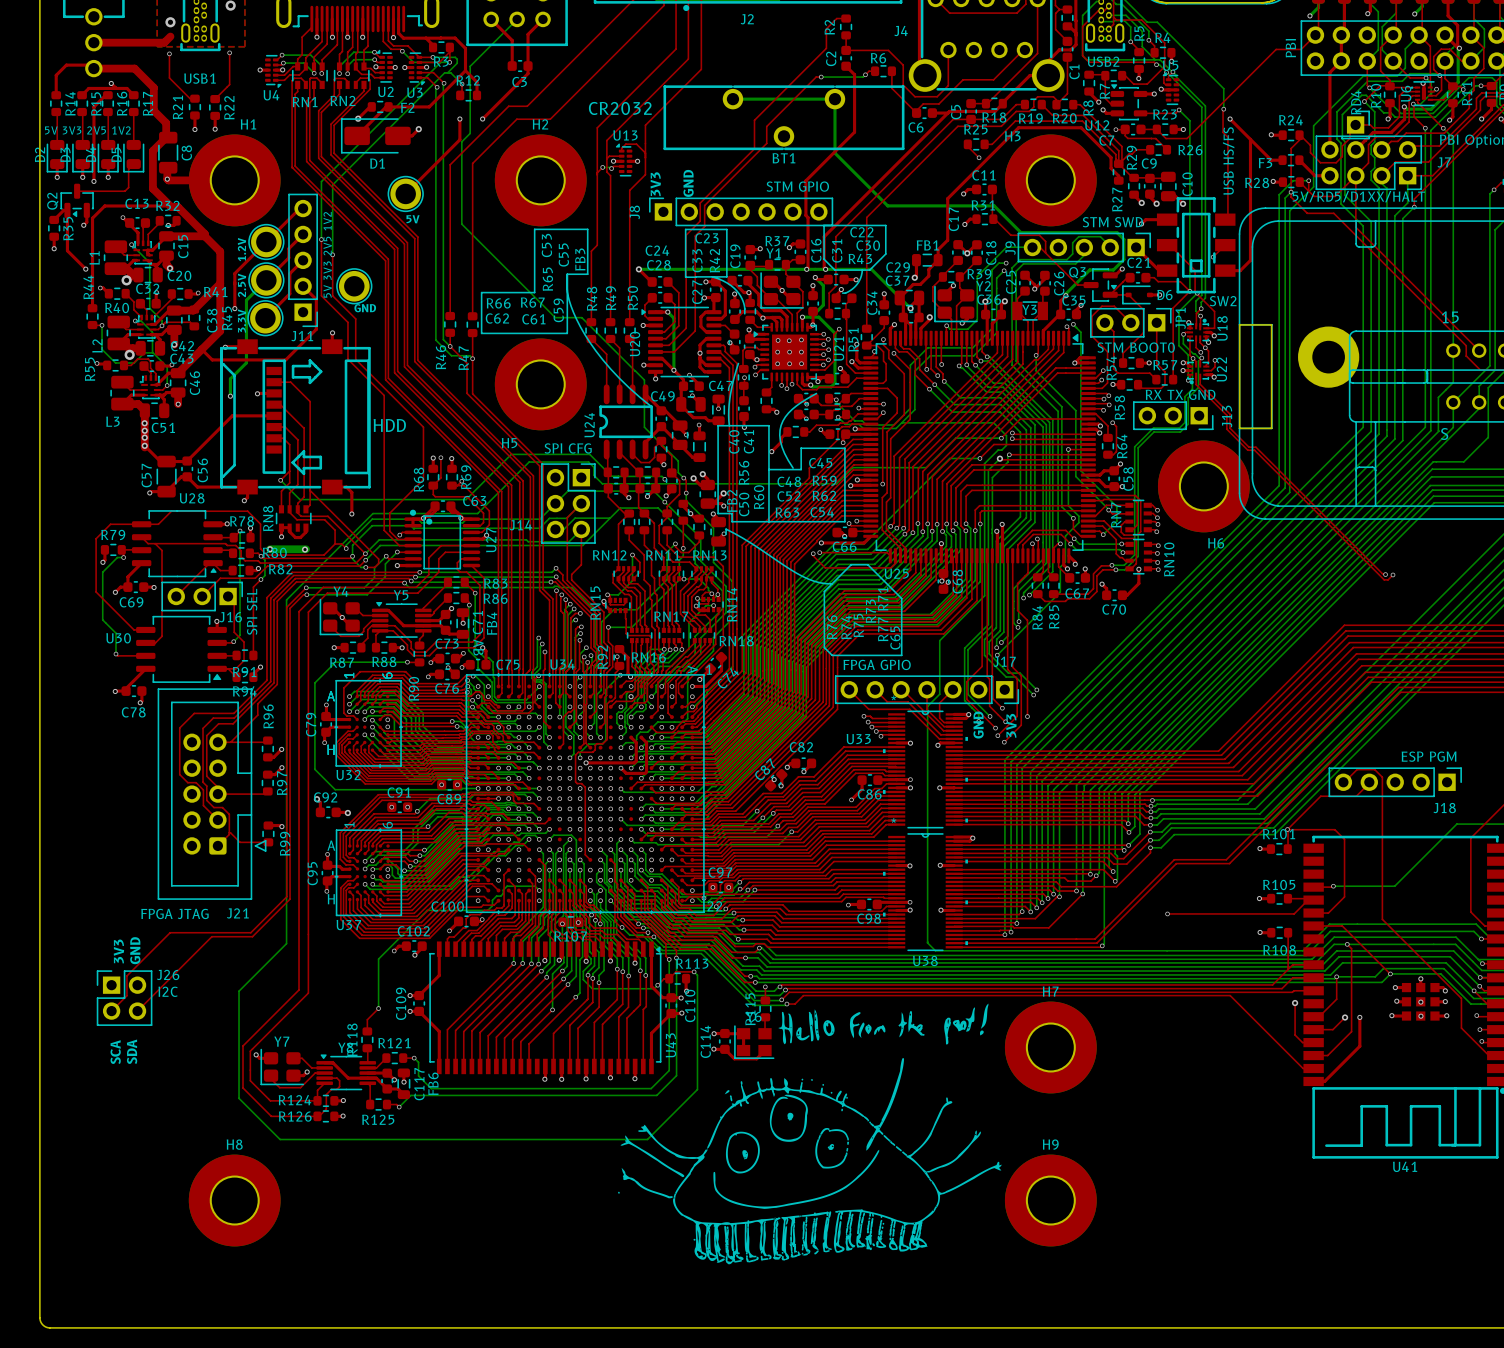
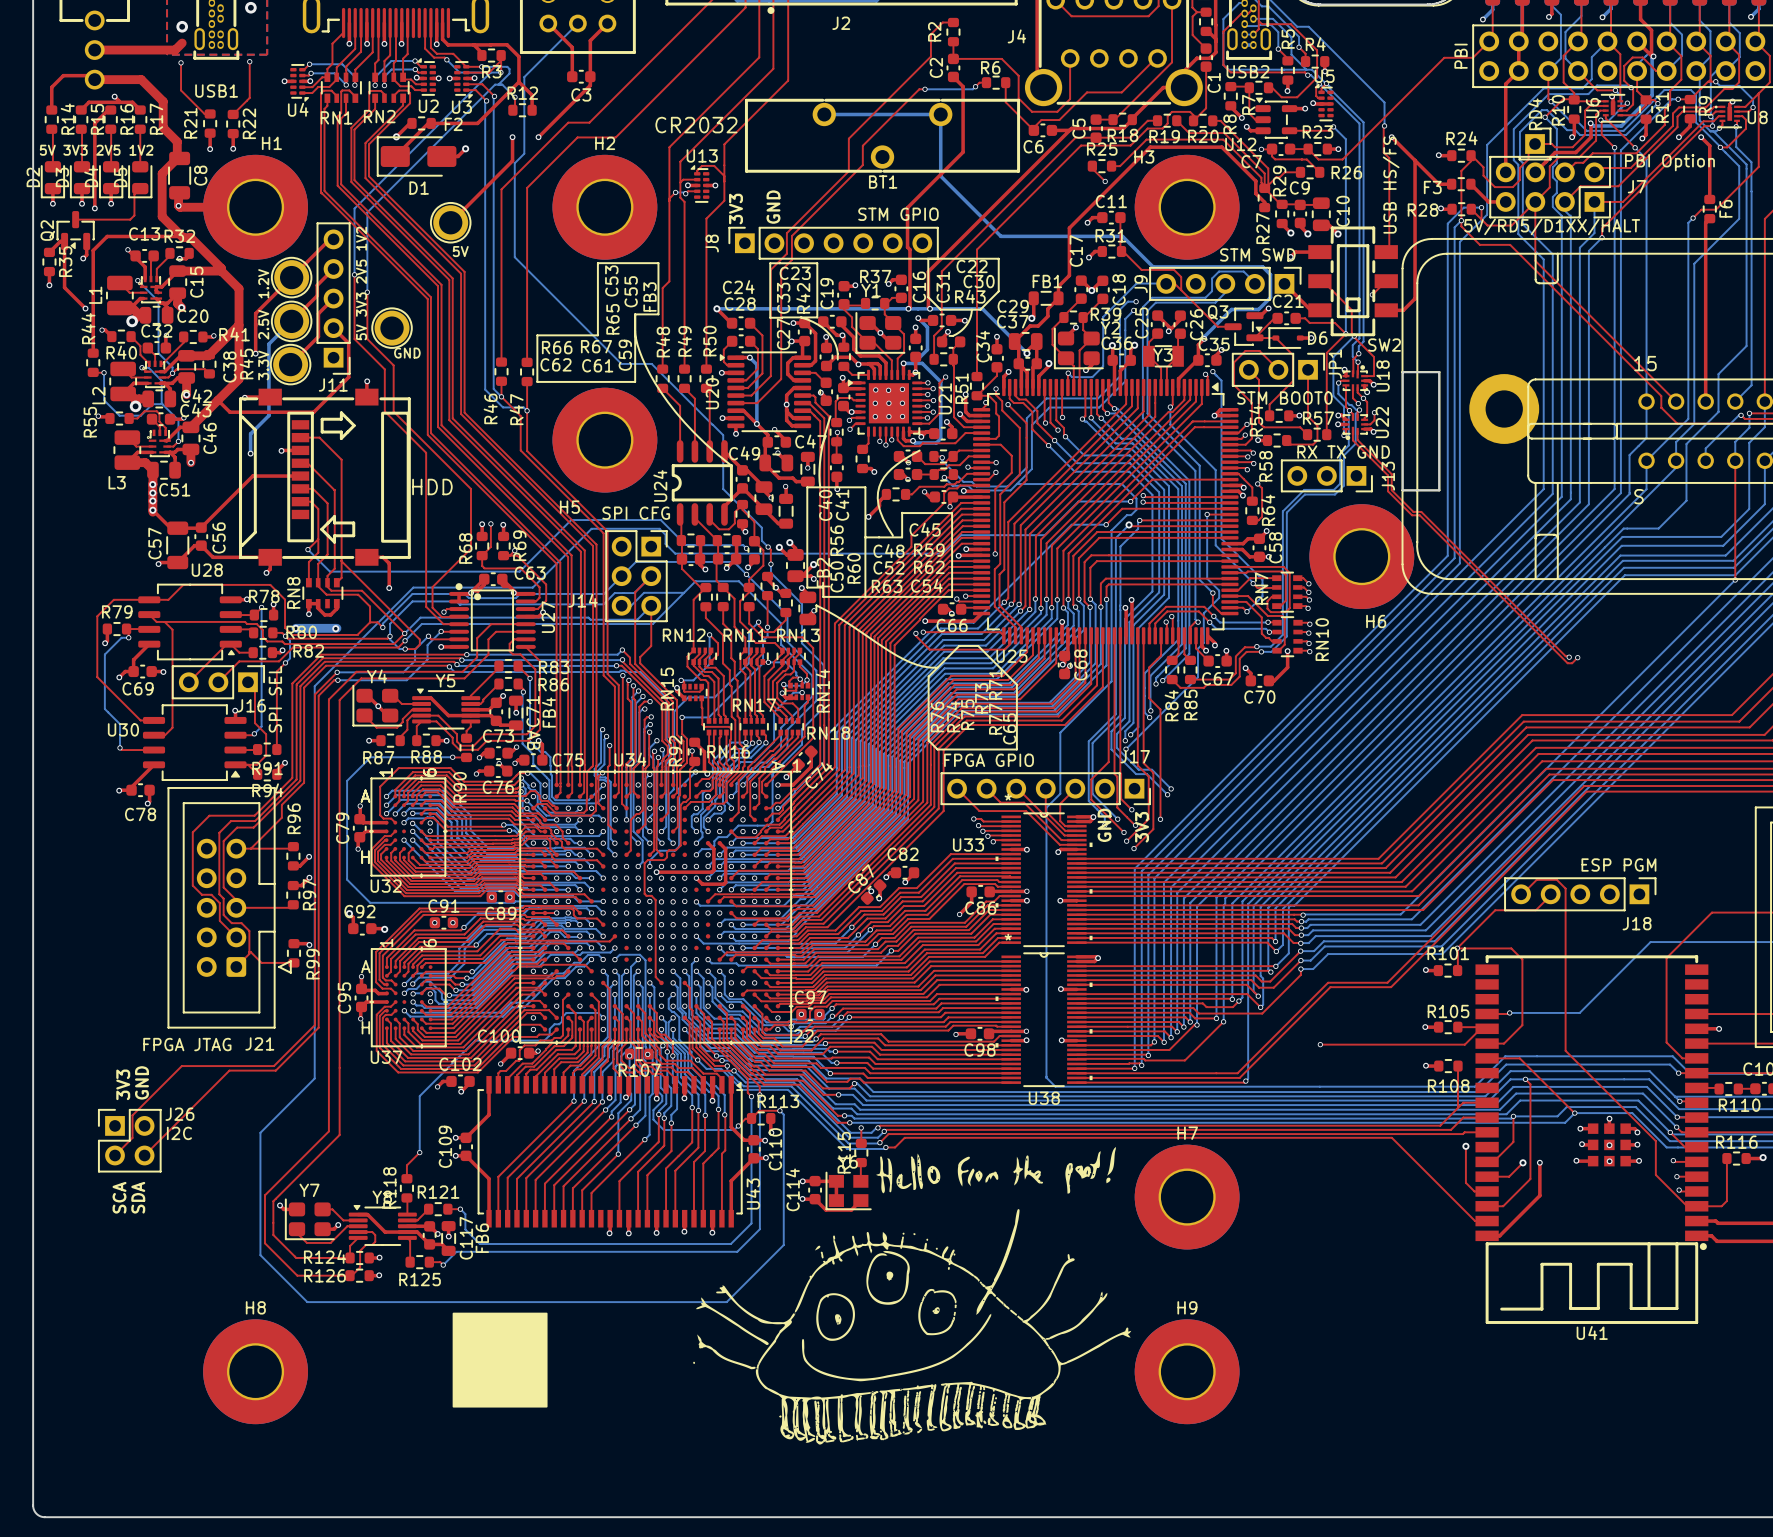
drawing: none -> [452, 1312, 548, 1408]

